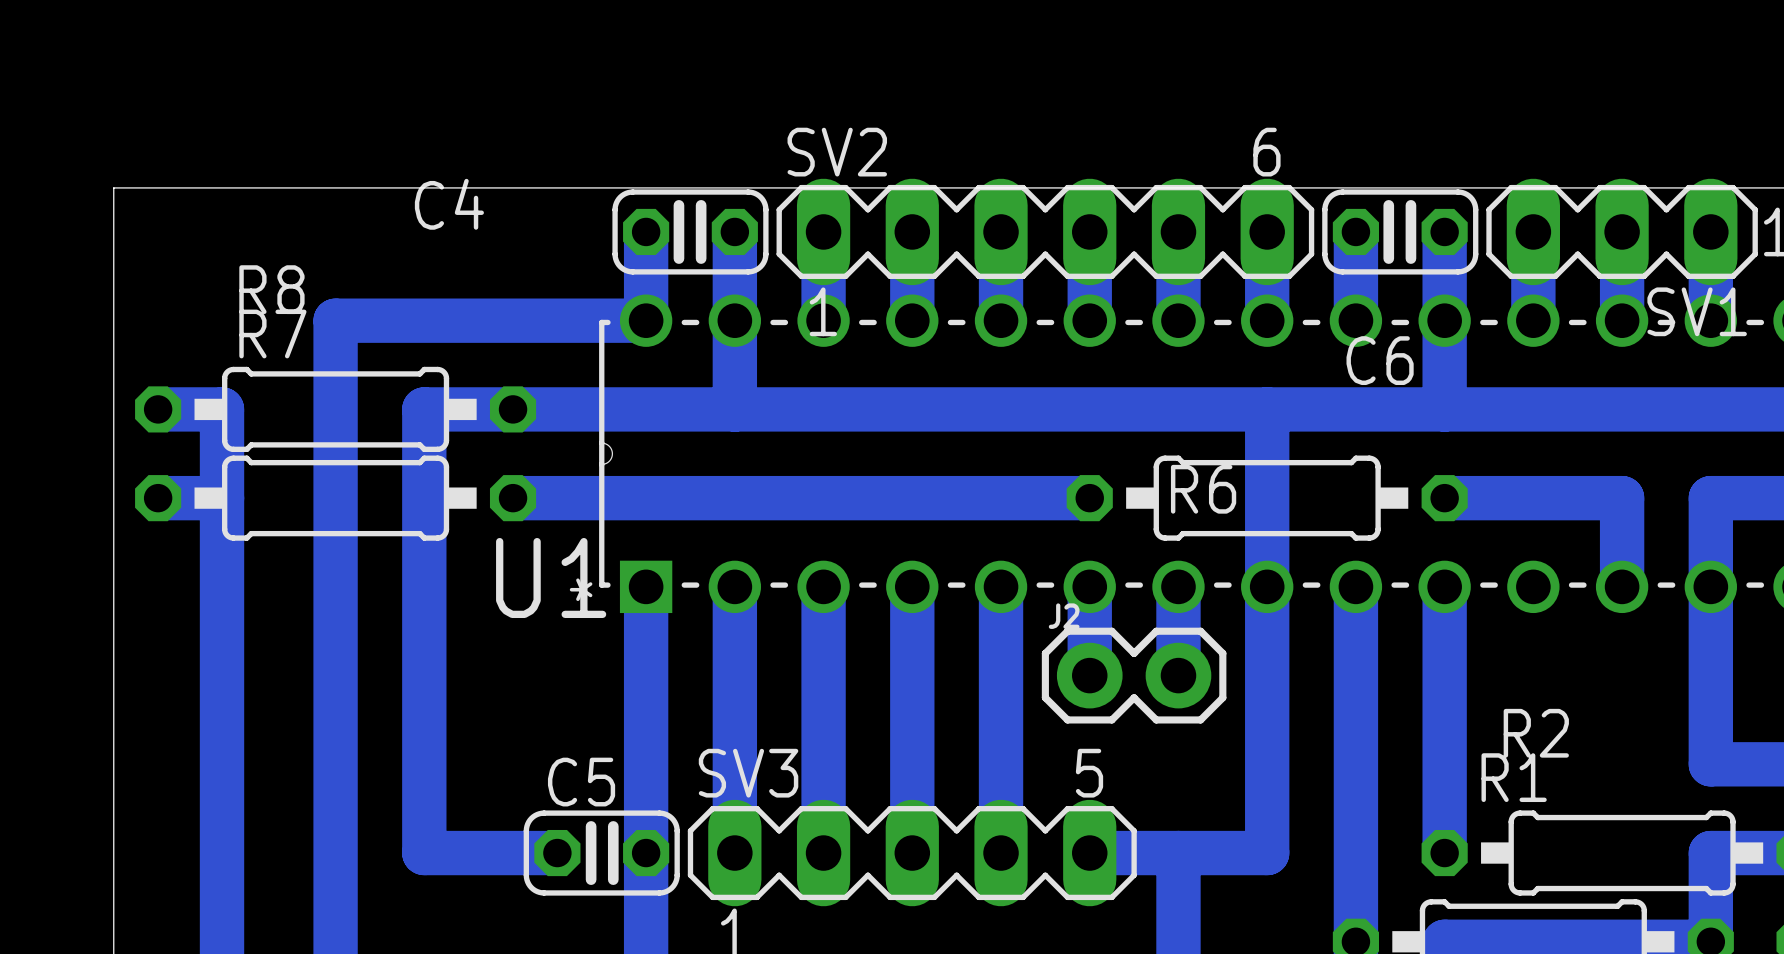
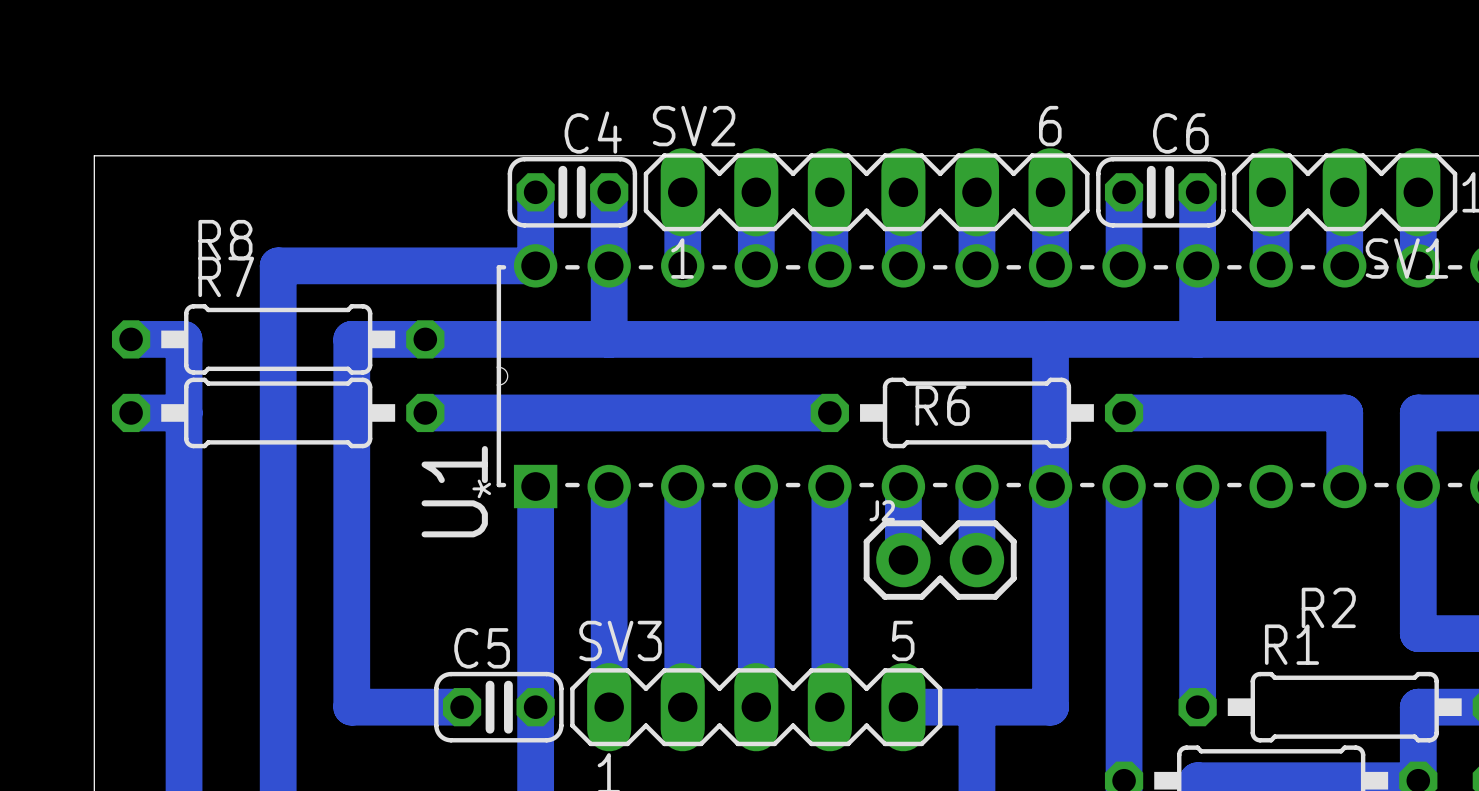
C4 name position: C4 (449, 204) -> C4 (593, 132)
C6 name position: C6 (1380, 360) -> C6 (1180, 133)
R6 name position: R6 (1203, 489) -> R6 (942, 405)
bottom track: (1001, 498) (1089, 498) -> (1124, 412) (1197, 412)
R6 position: (1267, 498) -> (976, 412)
U1 name rotation: 0° (551, 577) -> 90° counterclockwise (454, 491)
R2 name position: R2 (1536, 733) -> R2 (1328, 607)
R1 name position: R1 (1514, 777) -> R1 (1291, 644)

